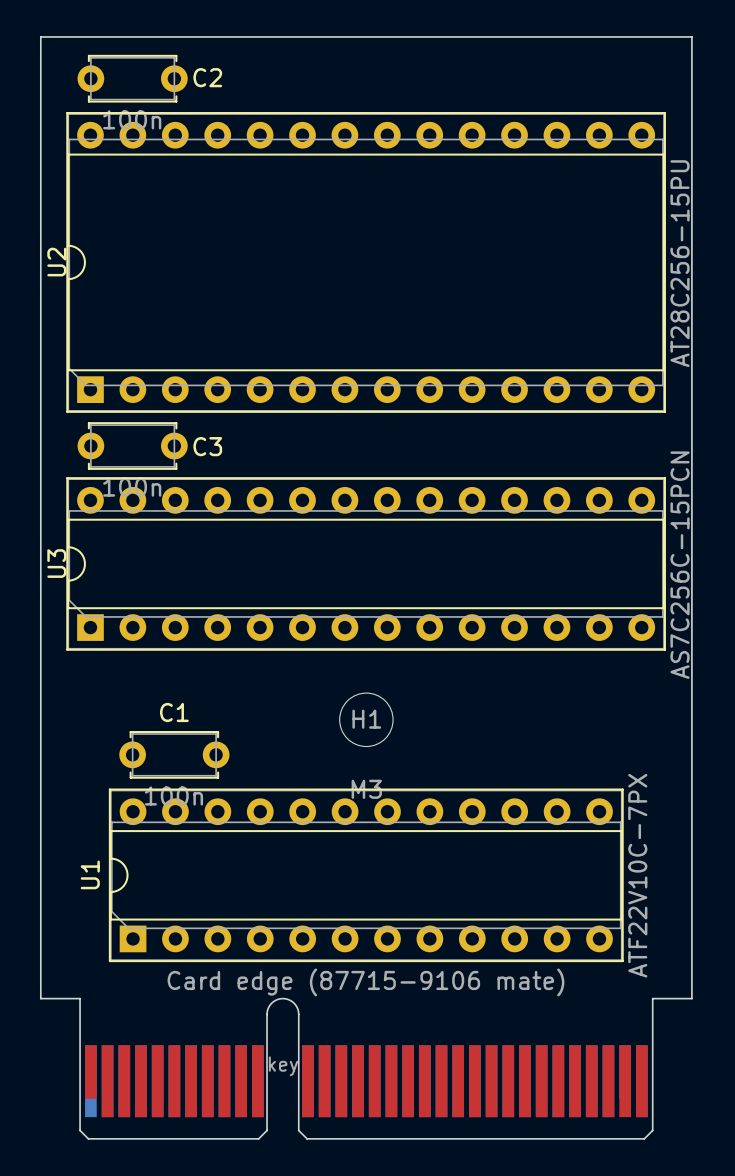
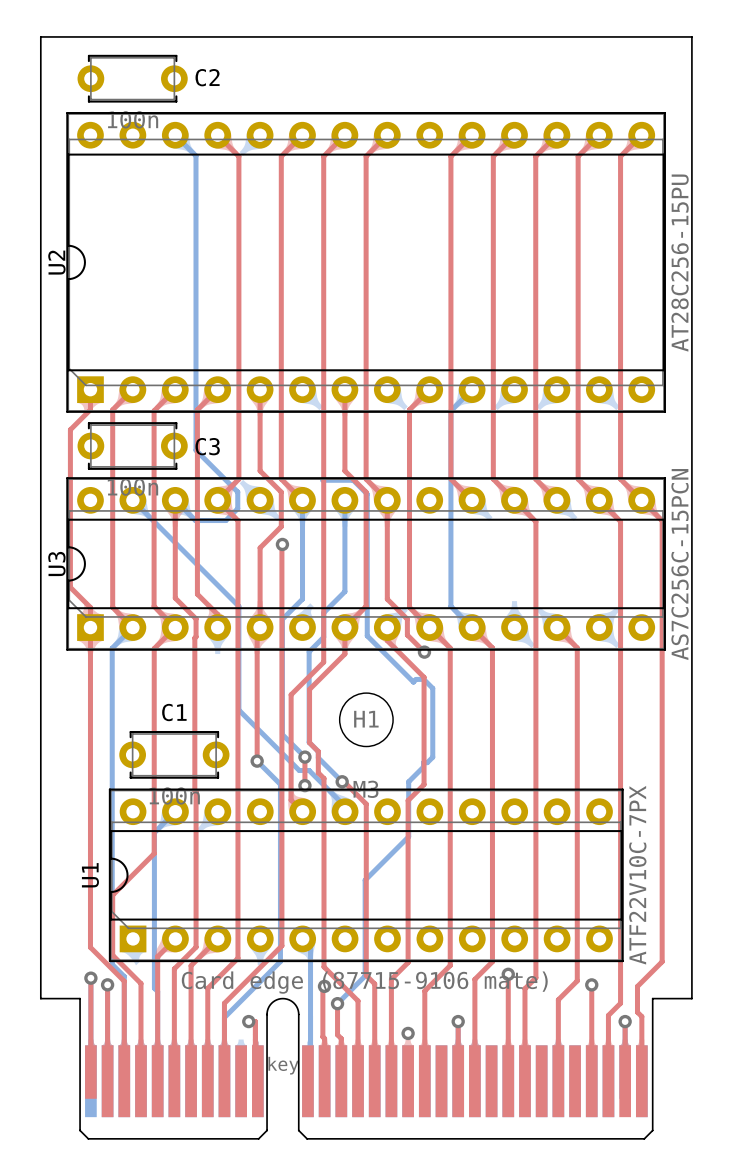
bottom track: none -> (175, 135) (195, 155) (195, 450) (237, 492) (237, 508) (225, 520) (195, 520) (175, 500)
top track: none -> (217, 135) (238, 156) (238, 479) (217, 500) (237, 520) (237, 958) (207, 988) (207, 1081)
top track: none -> (302, 135) (281, 156) (281, 479) (302, 500)
top track: none -> (344, 135) (323, 156) (323, 662) (291, 694) (291, 800) (302, 811)
top track: none -> (387, 135) (366, 156) (366, 479) (387, 500) (387, 599) (407, 619) (407, 635) (424, 652)
top track: none -> (472, 135) (450, 156) (450, 479) (472, 500)
top track: none -> (514, 135) (493, 156) (493, 479) (535, 521) (535, 977) (524, 988) (524, 1081)
top track: none -> (556, 135) (535, 156) (535, 479) (556, 500)
top track: none -> (599, 135) (578, 156) (578, 479) (620, 521) (620, 1003) (608, 1015) (608, 1081)
top track: none -> (641, 135) (620, 156) (620, 479) (662, 520) (662, 961) (637, 986) (637, 1012) (641, 1016) (641, 1081)
top track: none -> (90, 389) (90, 409) (70, 429) (70, 587) (90, 607) (90, 947) (124, 981) (124, 1081)
top track: none -> (132, 389) (112, 409) (112, 607) (132, 627)
top track: none -> (175, 389) (154, 410) (154, 606) (175, 627) (154, 648) (154, 853) (112, 895) (112, 955) (140, 983) (140, 1081)
top track: none -> (217, 389) (197, 409) (197, 594) (217, 614) (217, 627)
top track: none -> (260, 389) (260, 470) (281, 492) (281, 526) (260, 547) (260, 627) (257, 630) (257, 761)
top track: none -> (344, 389) (344, 470) (366, 492) (366, 606) (344, 627)
top track: none -> (429, 389) (409, 409) (409, 607) (450, 648) (450, 965) (424, 991) (424, 1081)
bottom track: none -> (472, 389) (450, 410) (450, 606) (472, 627)
bottom track: none -> (322, 480) (353, 480) (367, 494) (367, 635) (413, 682) (416, 679) (423, 679) (432, 688) (432, 757) (427, 762) (423, 762) (423, 766) (408, 781) (408, 836) (365, 880) (365, 976) (337, 1003)
bottom track: none -> (132, 500) (238, 606) (238, 710) (299, 770) (309, 770) (345, 806) (345, 811)
top track: none -> (175, 500) (175, 598) (196, 618) (196, 947) (174, 968) (174, 1081)
bottom track: none -> (302, 500) (302, 599) (282, 619) (282, 734) (304, 757)
bottom track: none -> (344, 500) (344, 591) (323, 612) (323, 637) (309, 651) (309, 742) (318, 751) (318, 757) (342, 781)
top track: none -> (282, 544) (281, 945) (224, 1003) (224, 1081)
via: none -> (282, 544)
bottom track: none -> (132, 627) (112, 648) (112, 964) (124, 976) (124, 1081)
top track: none -> (344, 627) (344, 654) (309, 689) (309, 742) (318, 751) (318, 772) (323, 778) (323, 966) (358, 1000) (358, 1081)
top track: none -> (387, 627) (387, 640) (424, 677) (424, 784) (408, 800) (408, 962) (391, 979) (391, 1081)
top track: none -> (472, 627) (492, 647) (492, 961) (474, 979) (474, 1081)
top track: none -> (556, 627) (577, 647) (577, 980) (558, 999) (558, 1081)
via: none -> (424, 652)
top track: none -> (304, 757) (304, 785)
via: none -> (304, 757)
bottom track: none -> (257, 761) (280, 784) (280, 961) (224, 1017) (224, 1081)
via: none -> (257, 761)
top track: none -> (342, 781) (366, 804) (366, 975) (374, 983) (374, 1081)
via: none -> (342, 781)
via: none -> (304, 785)
bottom track: none -> (175, 811) (154, 832) (154, 988) (157, 991) (157, 1081)
top track: none -> (175, 938) (157, 956) (157, 1081)
top track: none -> (217, 938) (191, 965) (191, 1081)
bottom track: none -> (302, 938) (310, 946) (310, 1047)
top track: none -> (508, 974) (508, 1081)
via: none -> (508, 974)
top track: none -> (90, 978) (90, 1047)
via: none -> (90, 978)
top track: none -> (107, 984) (107, 1047)
via: none -> (107, 984)
top track: none -> (591, 984) (591, 1081)
via: none -> (591, 984)
top track: none -> (324, 986) (322, 988) (322, 1036) (324, 1038) (324, 1081)
via: none -> (324, 986)
top track: none -> (337, 1003) (337, 1034) (341, 1038) (341, 1081)
via: none -> (337, 1003)
top track: none -> (248, 1021) (255, 1021) (255, 1047)
via: none -> (248, 1021)
top track: none -> (458, 1021) (458, 1047)
via: none -> (458, 1021)
top track: none -> (625, 1021) (625, 1047)
via: none -> (625, 1021)
via: none -> (408, 1033)

